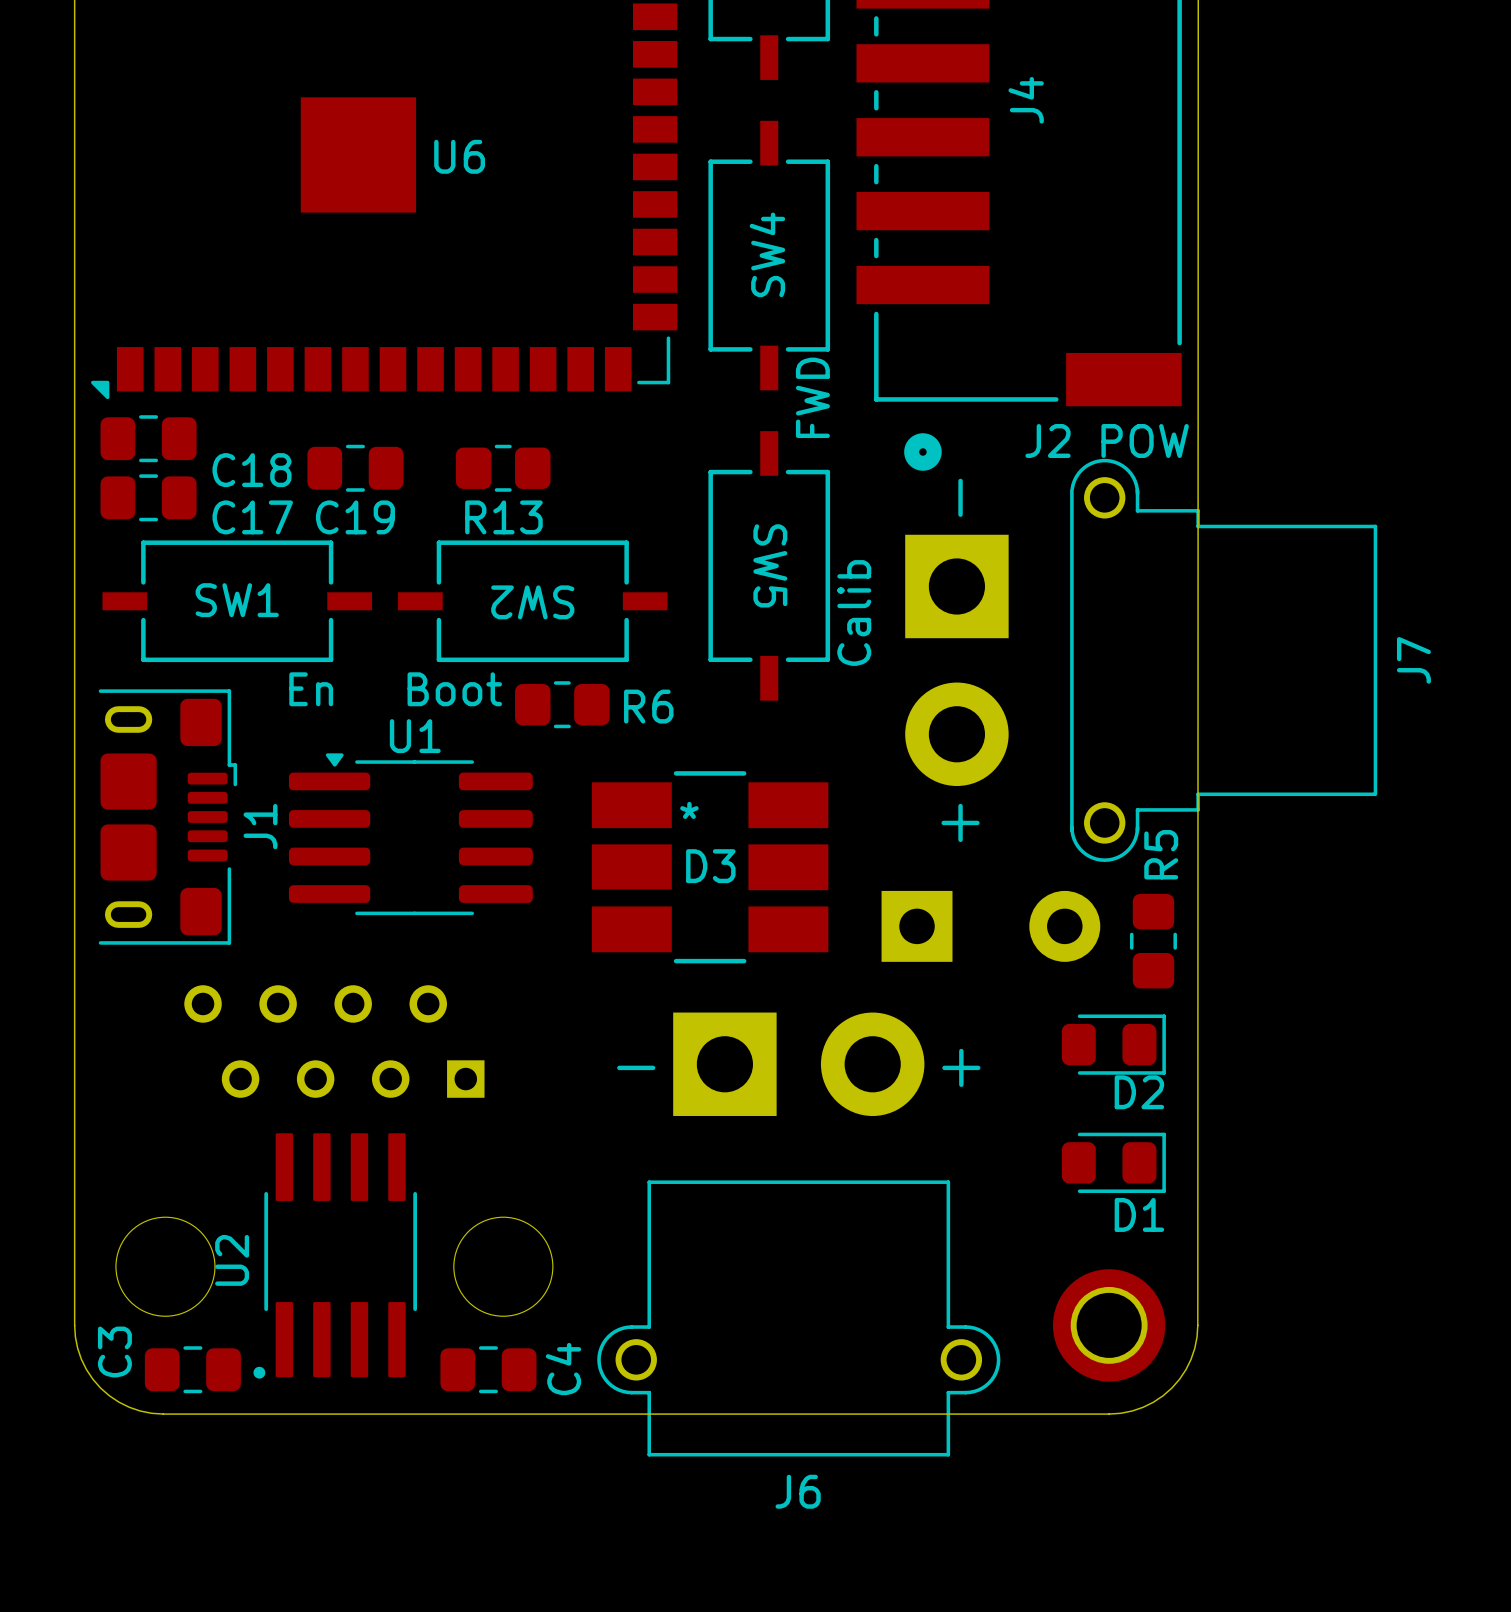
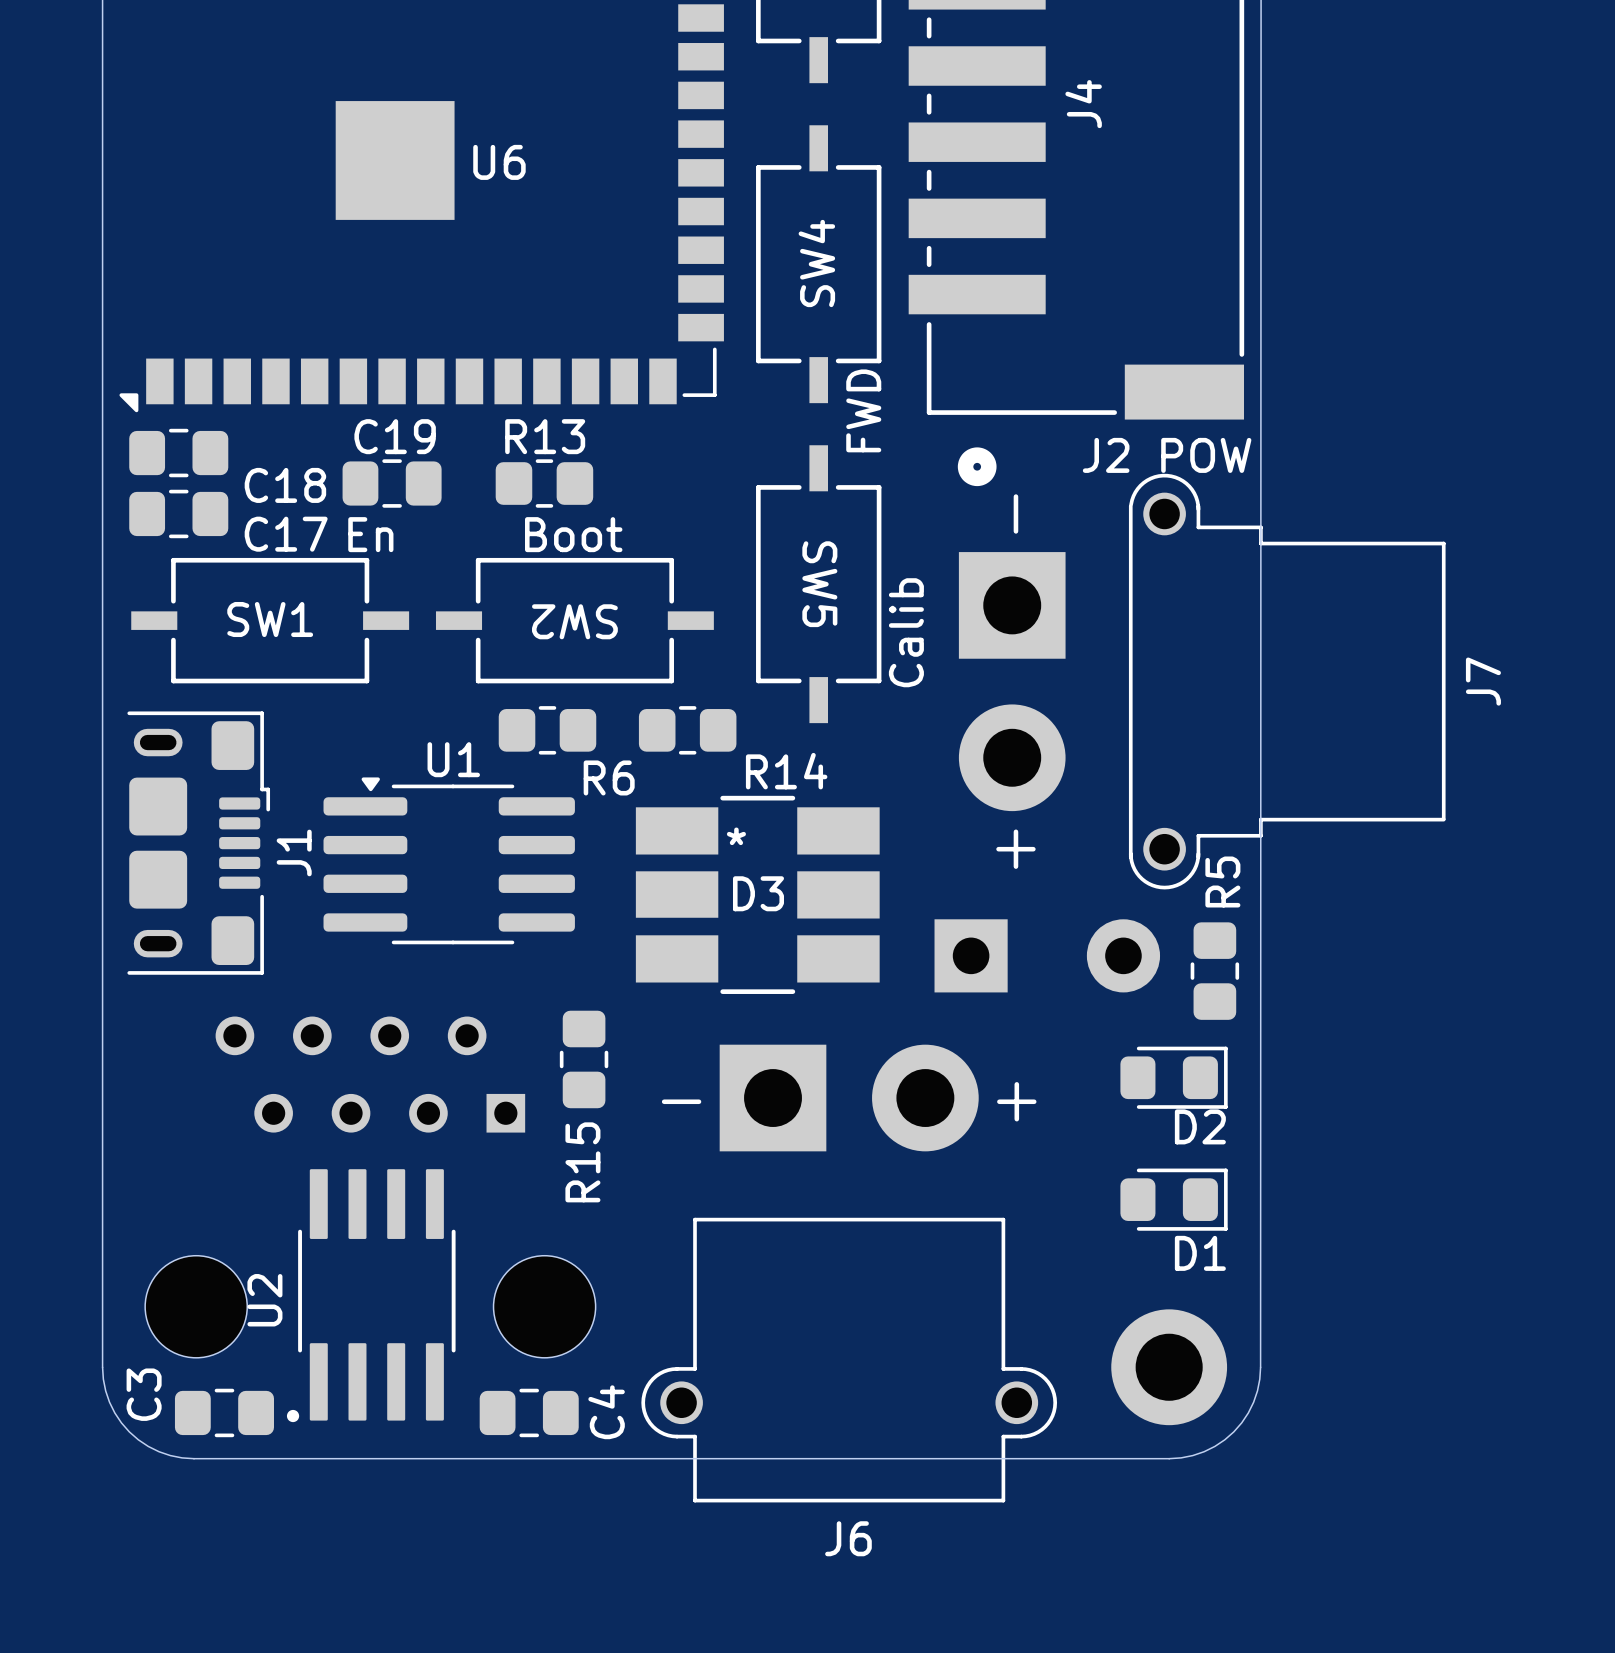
C19 name position: C19 (355, 517) -> C19 (395, 436)
R13 name position: R13 (503, 517) -> R13 (545, 436)
text position: En (311, 689) -> En (370, 534)
text position: Boot (454, 689) -> Boot (573, 534)
R6 position: (562, 704) -> (547, 730)
R6 name position: R6 (648, 706) -> R6 (609, 777)
R14: none -> (687, 730)
R15: none -> (584, 1059)

